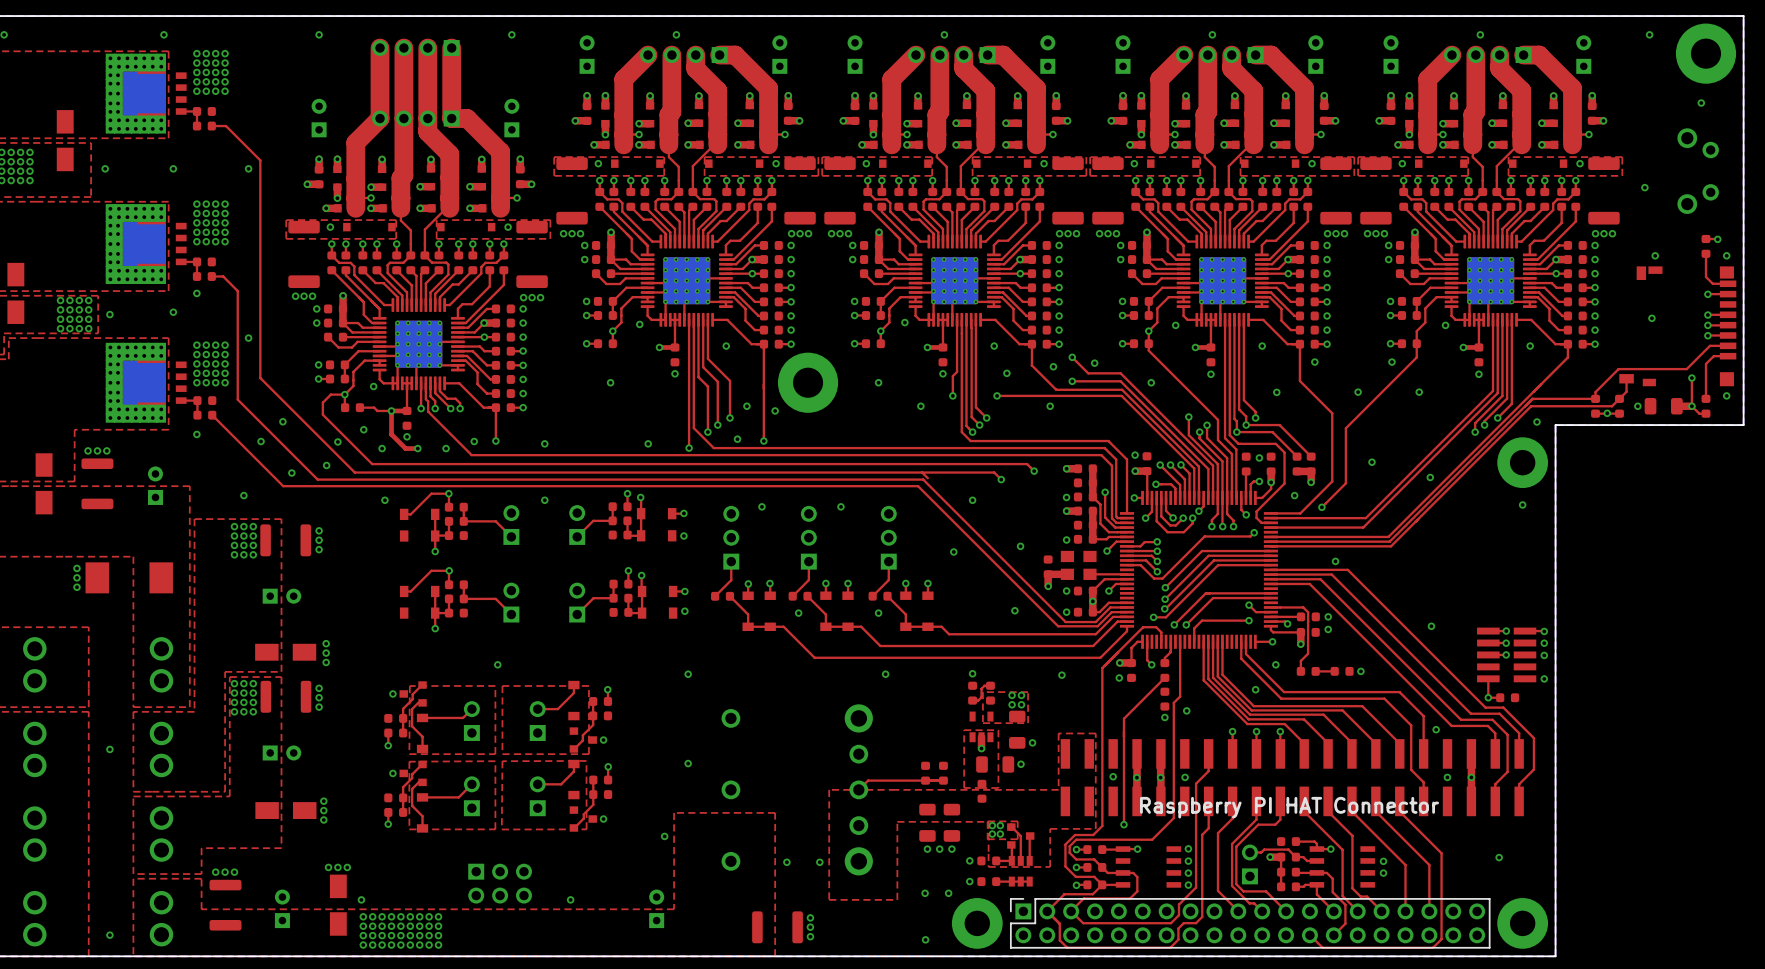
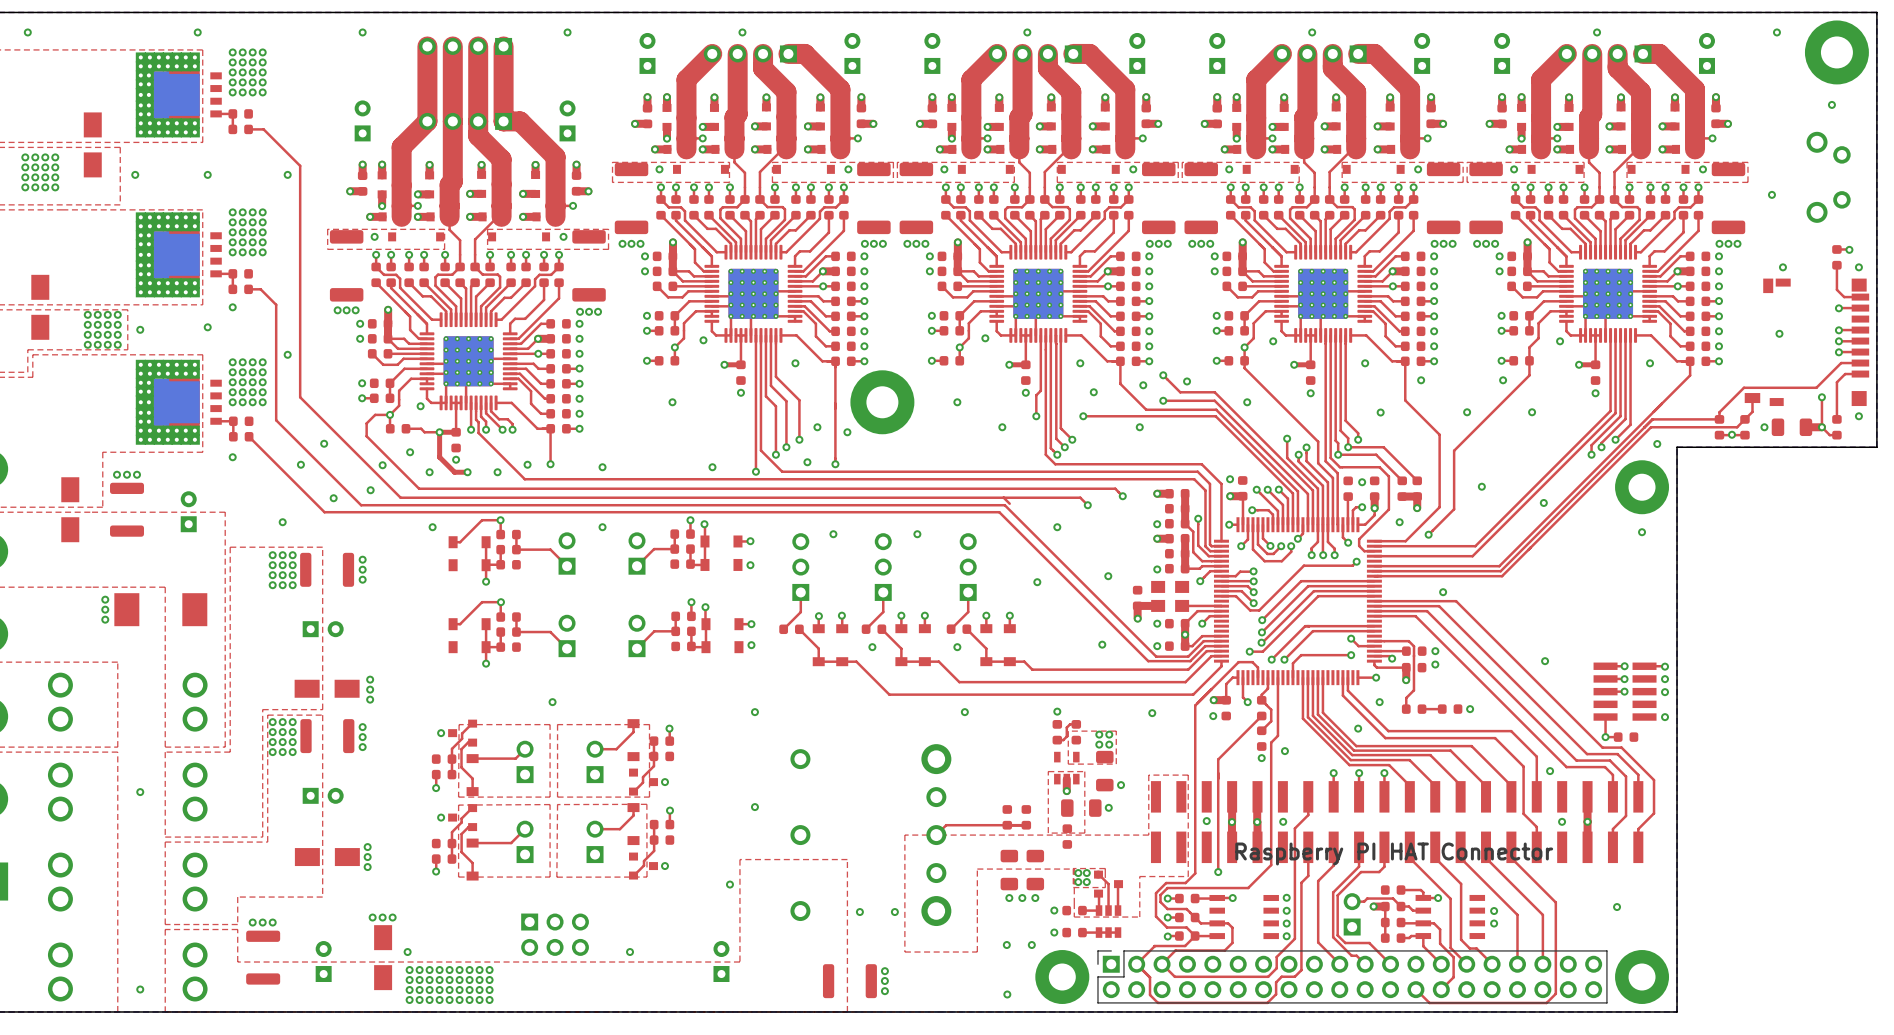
top track: none -> (1261, 700) (1271, 709) (1271, 721) (1261, 730)

